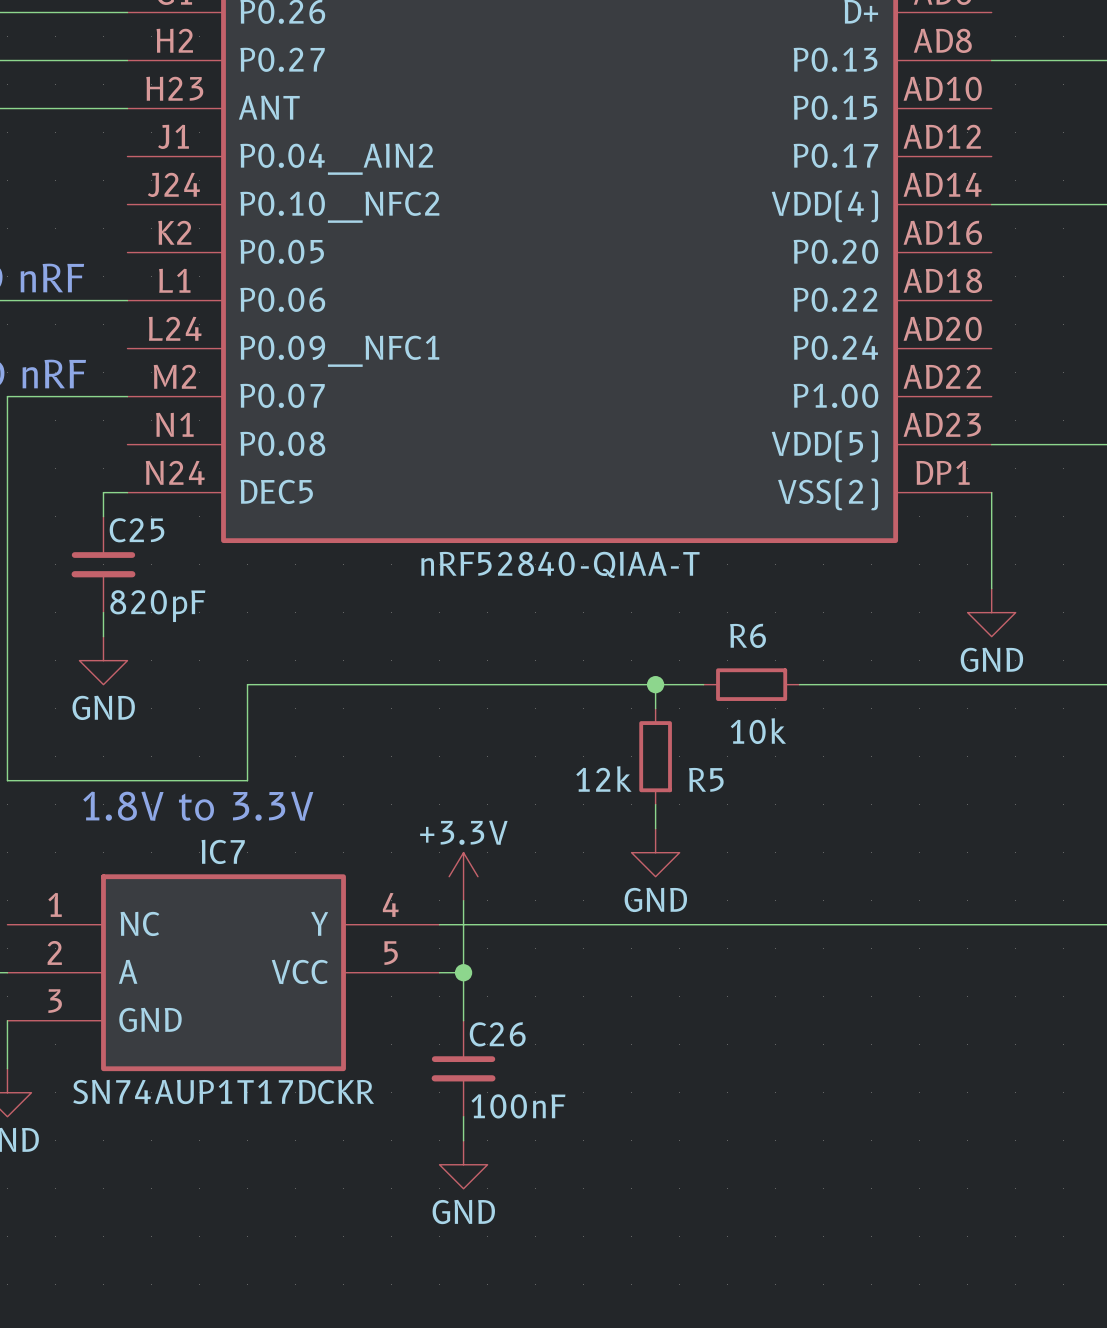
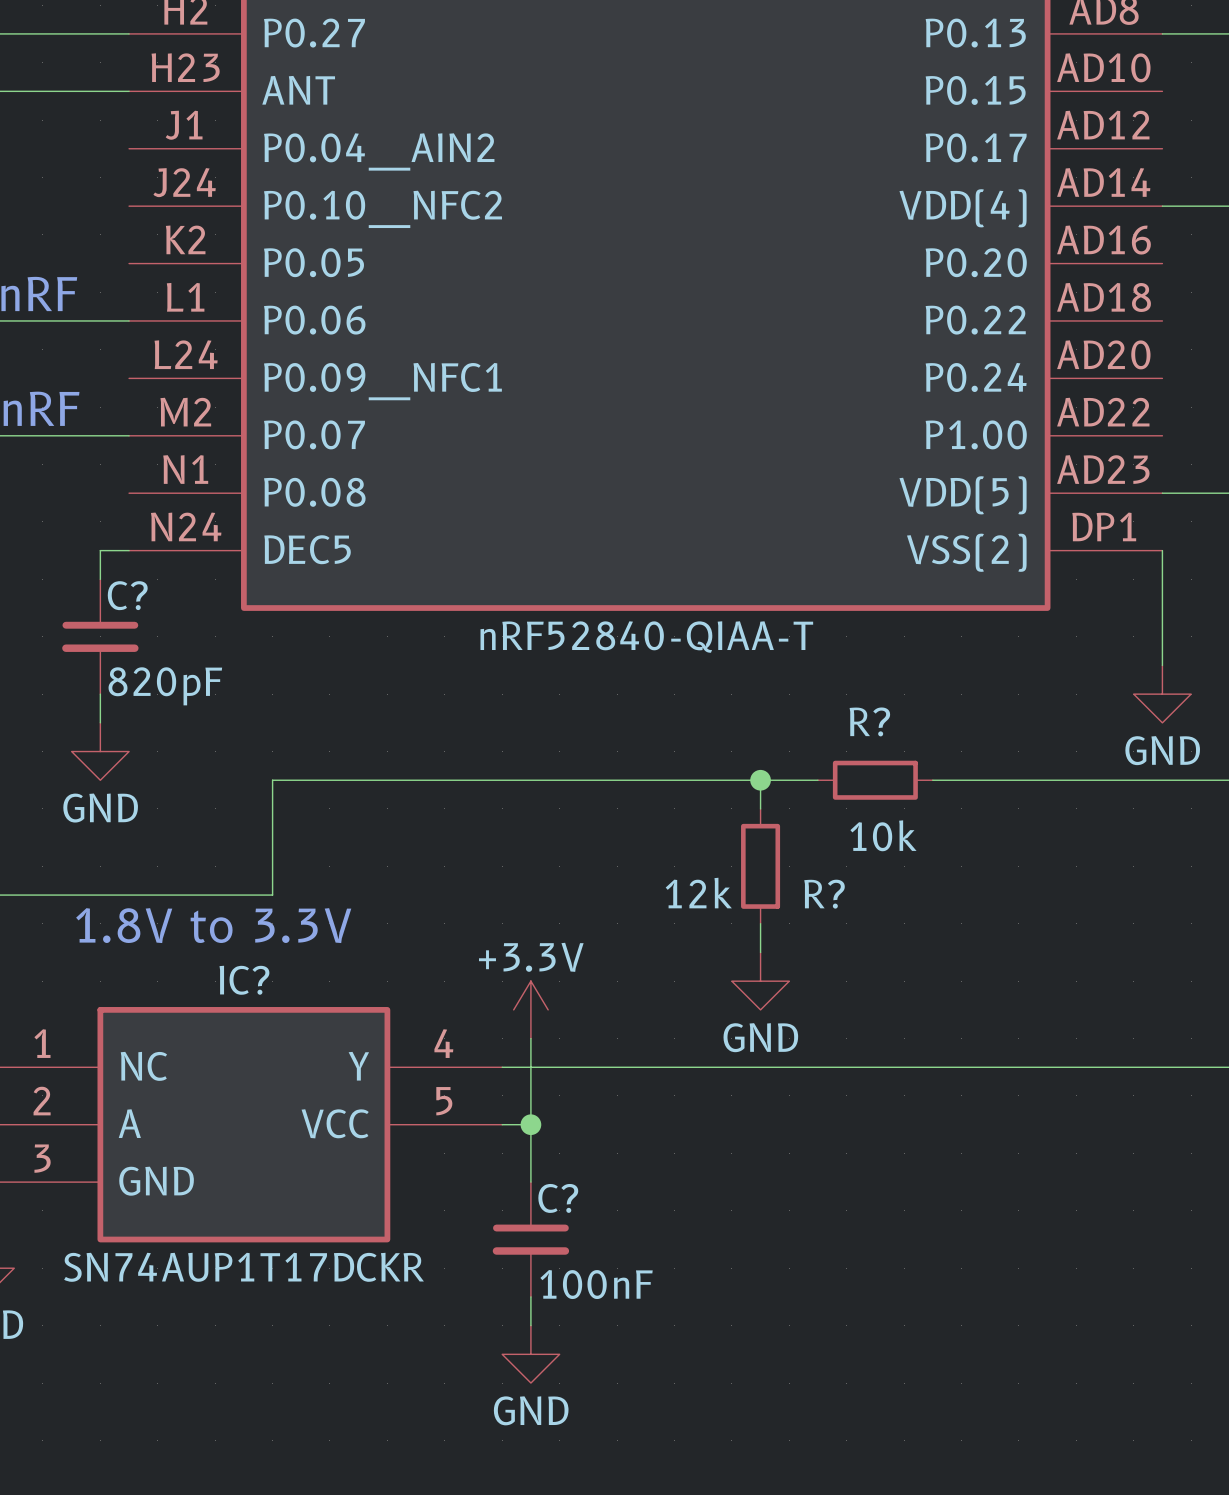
C25 name: C25 (137, 530) -> C? (127, 595)
R6 name: R6 (748, 635) -> R? (869, 721)
R5 name: R5 (706, 779) -> R? (824, 894)
IC7 name: IC7 (223, 851) -> IC? (244, 980)
C26 name: C26 (497, 1034) -> C? (558, 1198)

